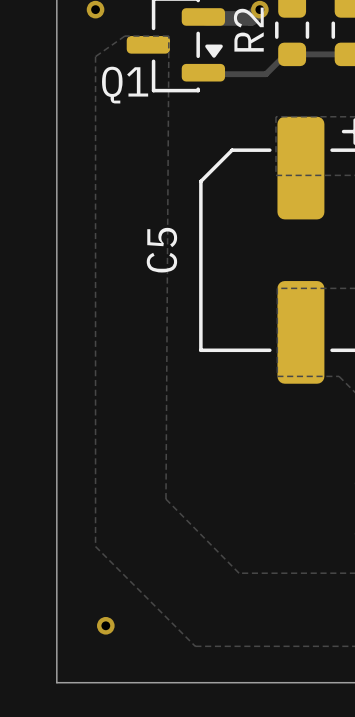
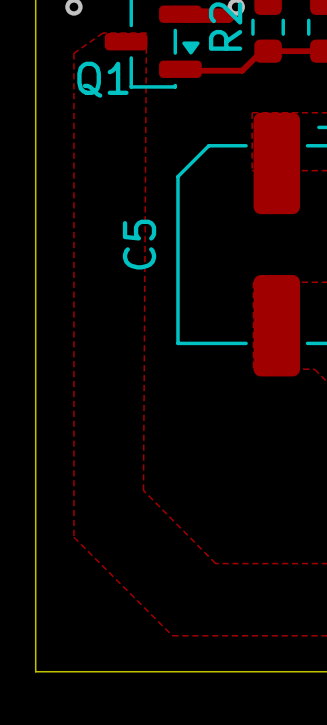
via: (105, 625) -> none

